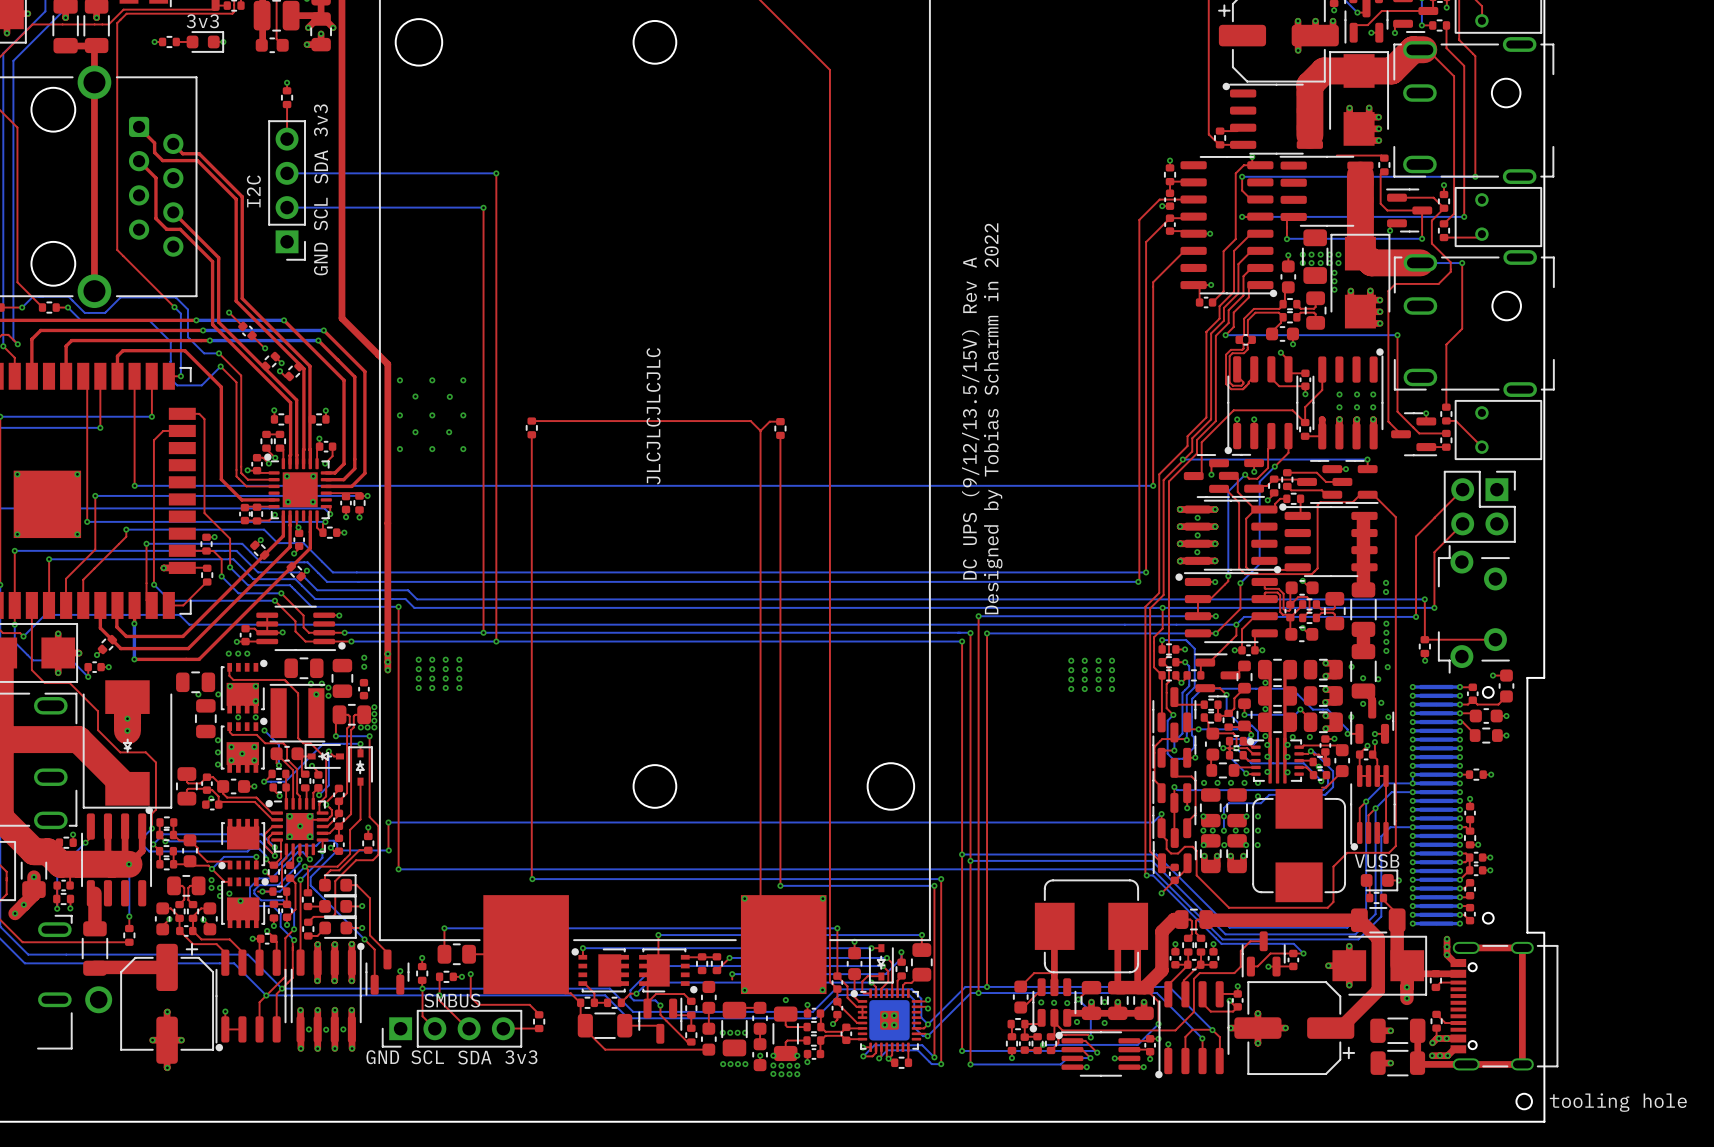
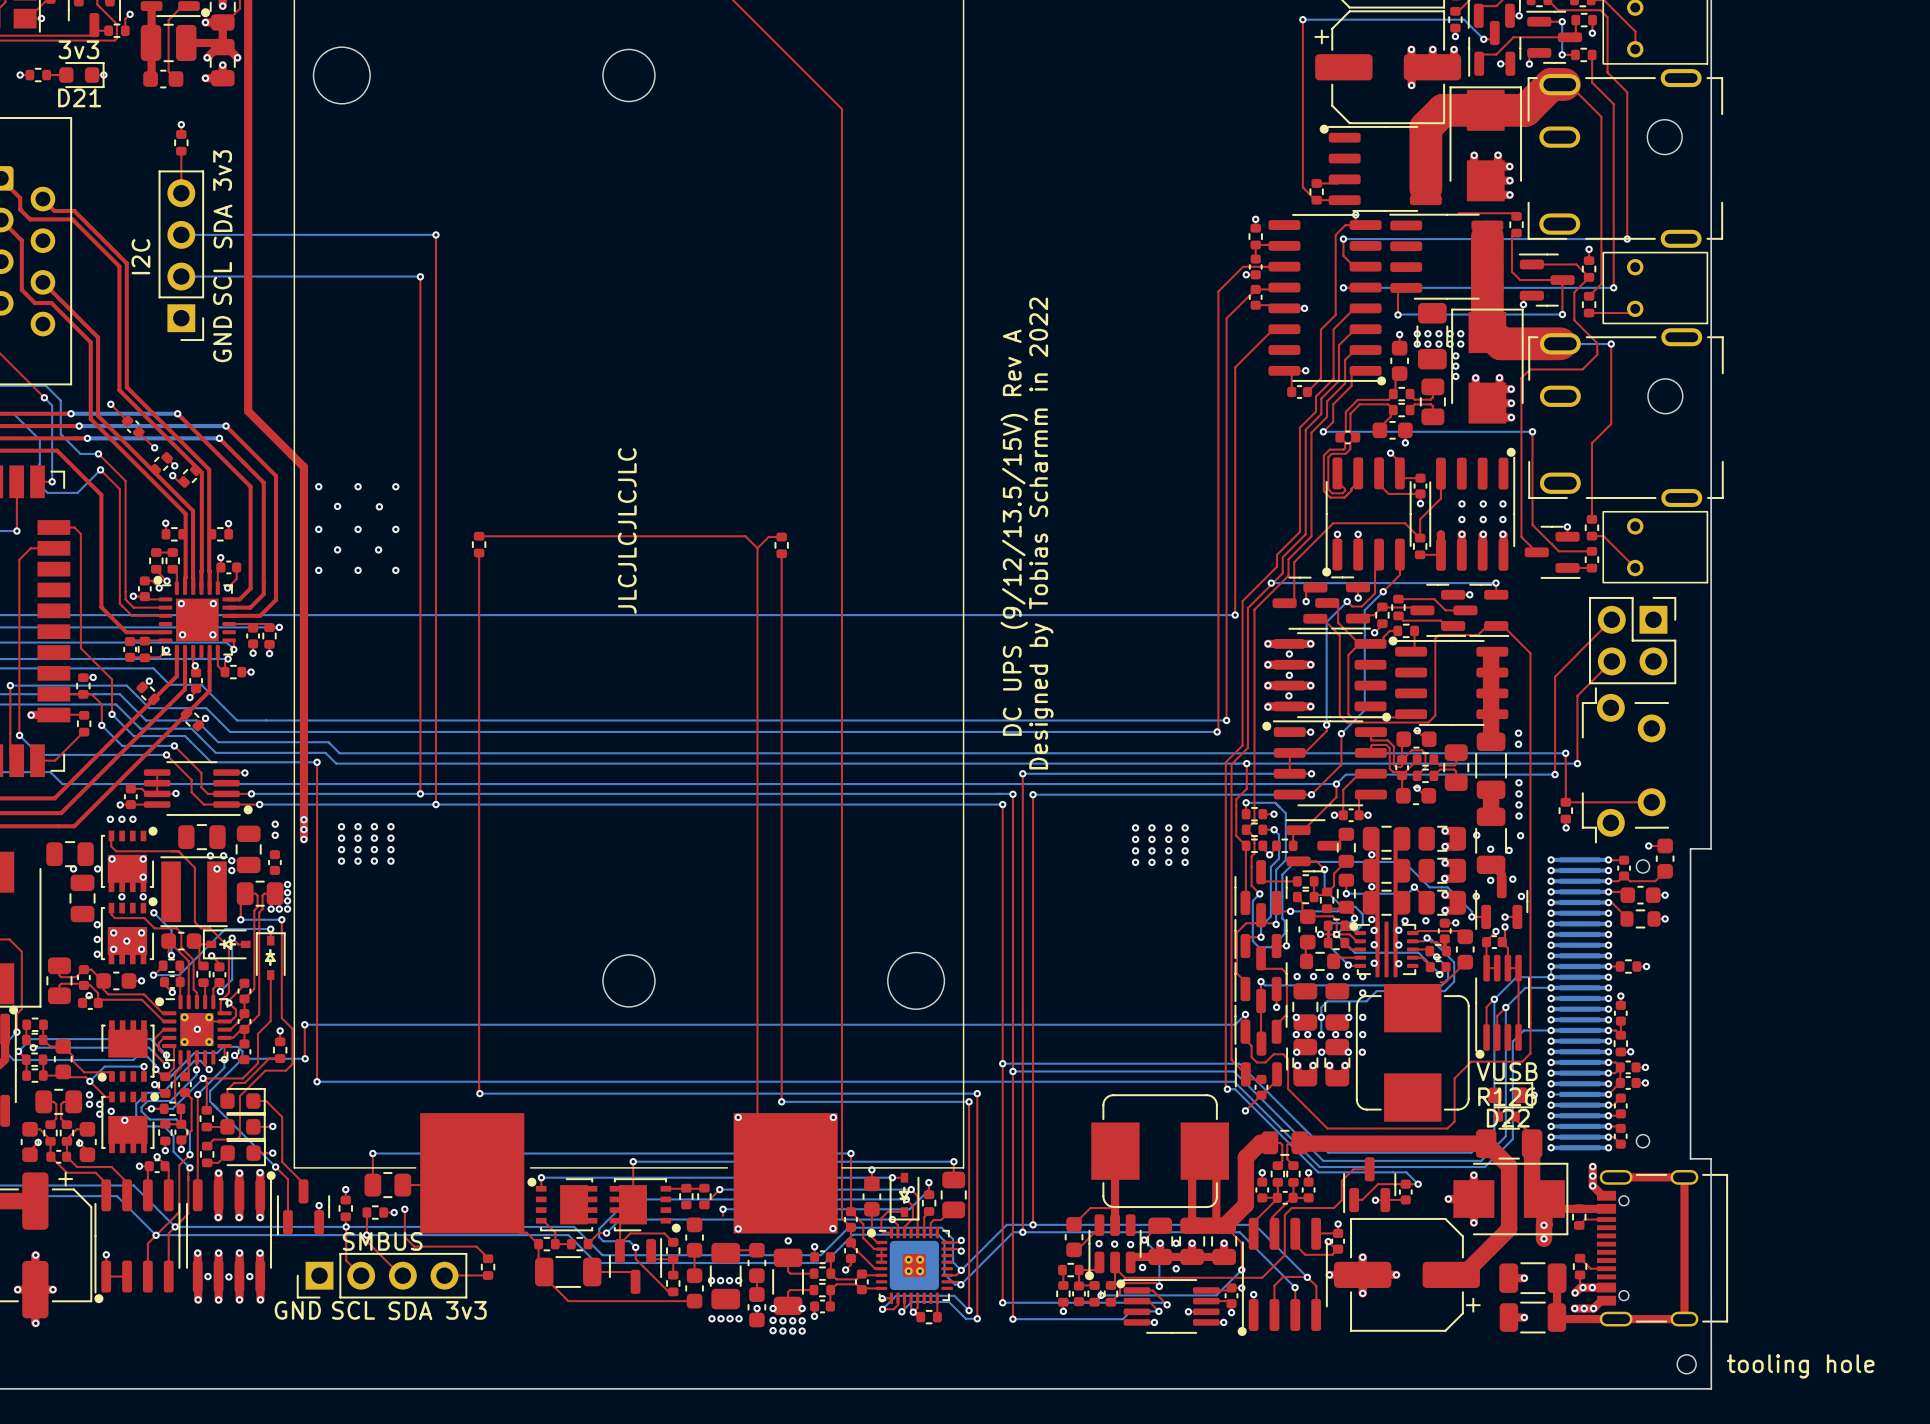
D21 name: none -> D21 (79, 97)
R126 name: none -> R126 (1507, 1096)
D22 name: none -> D22 (1508, 1118)

